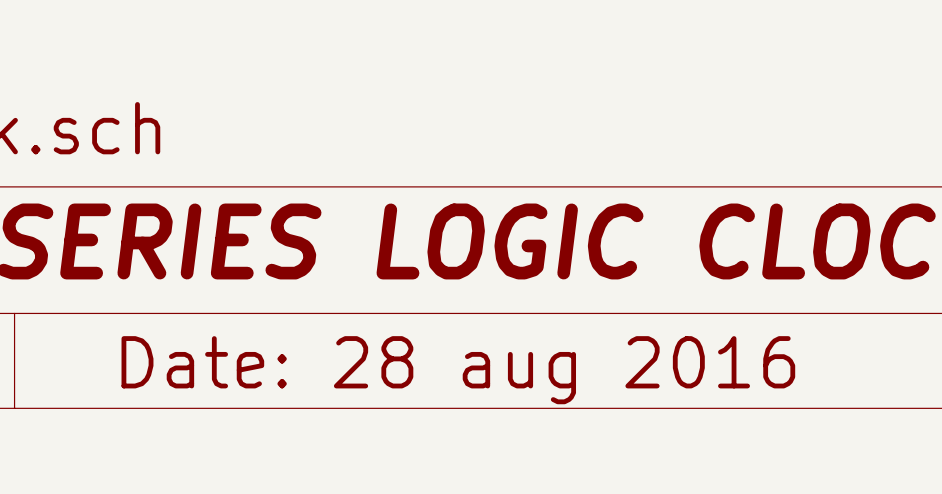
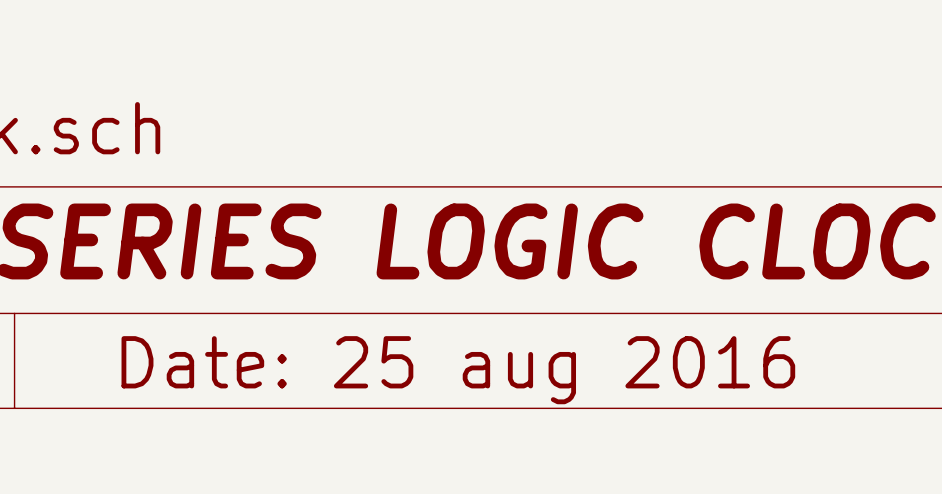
title block: Date: 28 aug 2016 (458, 370) -> Date: 25 aug 2016 (458, 370)

